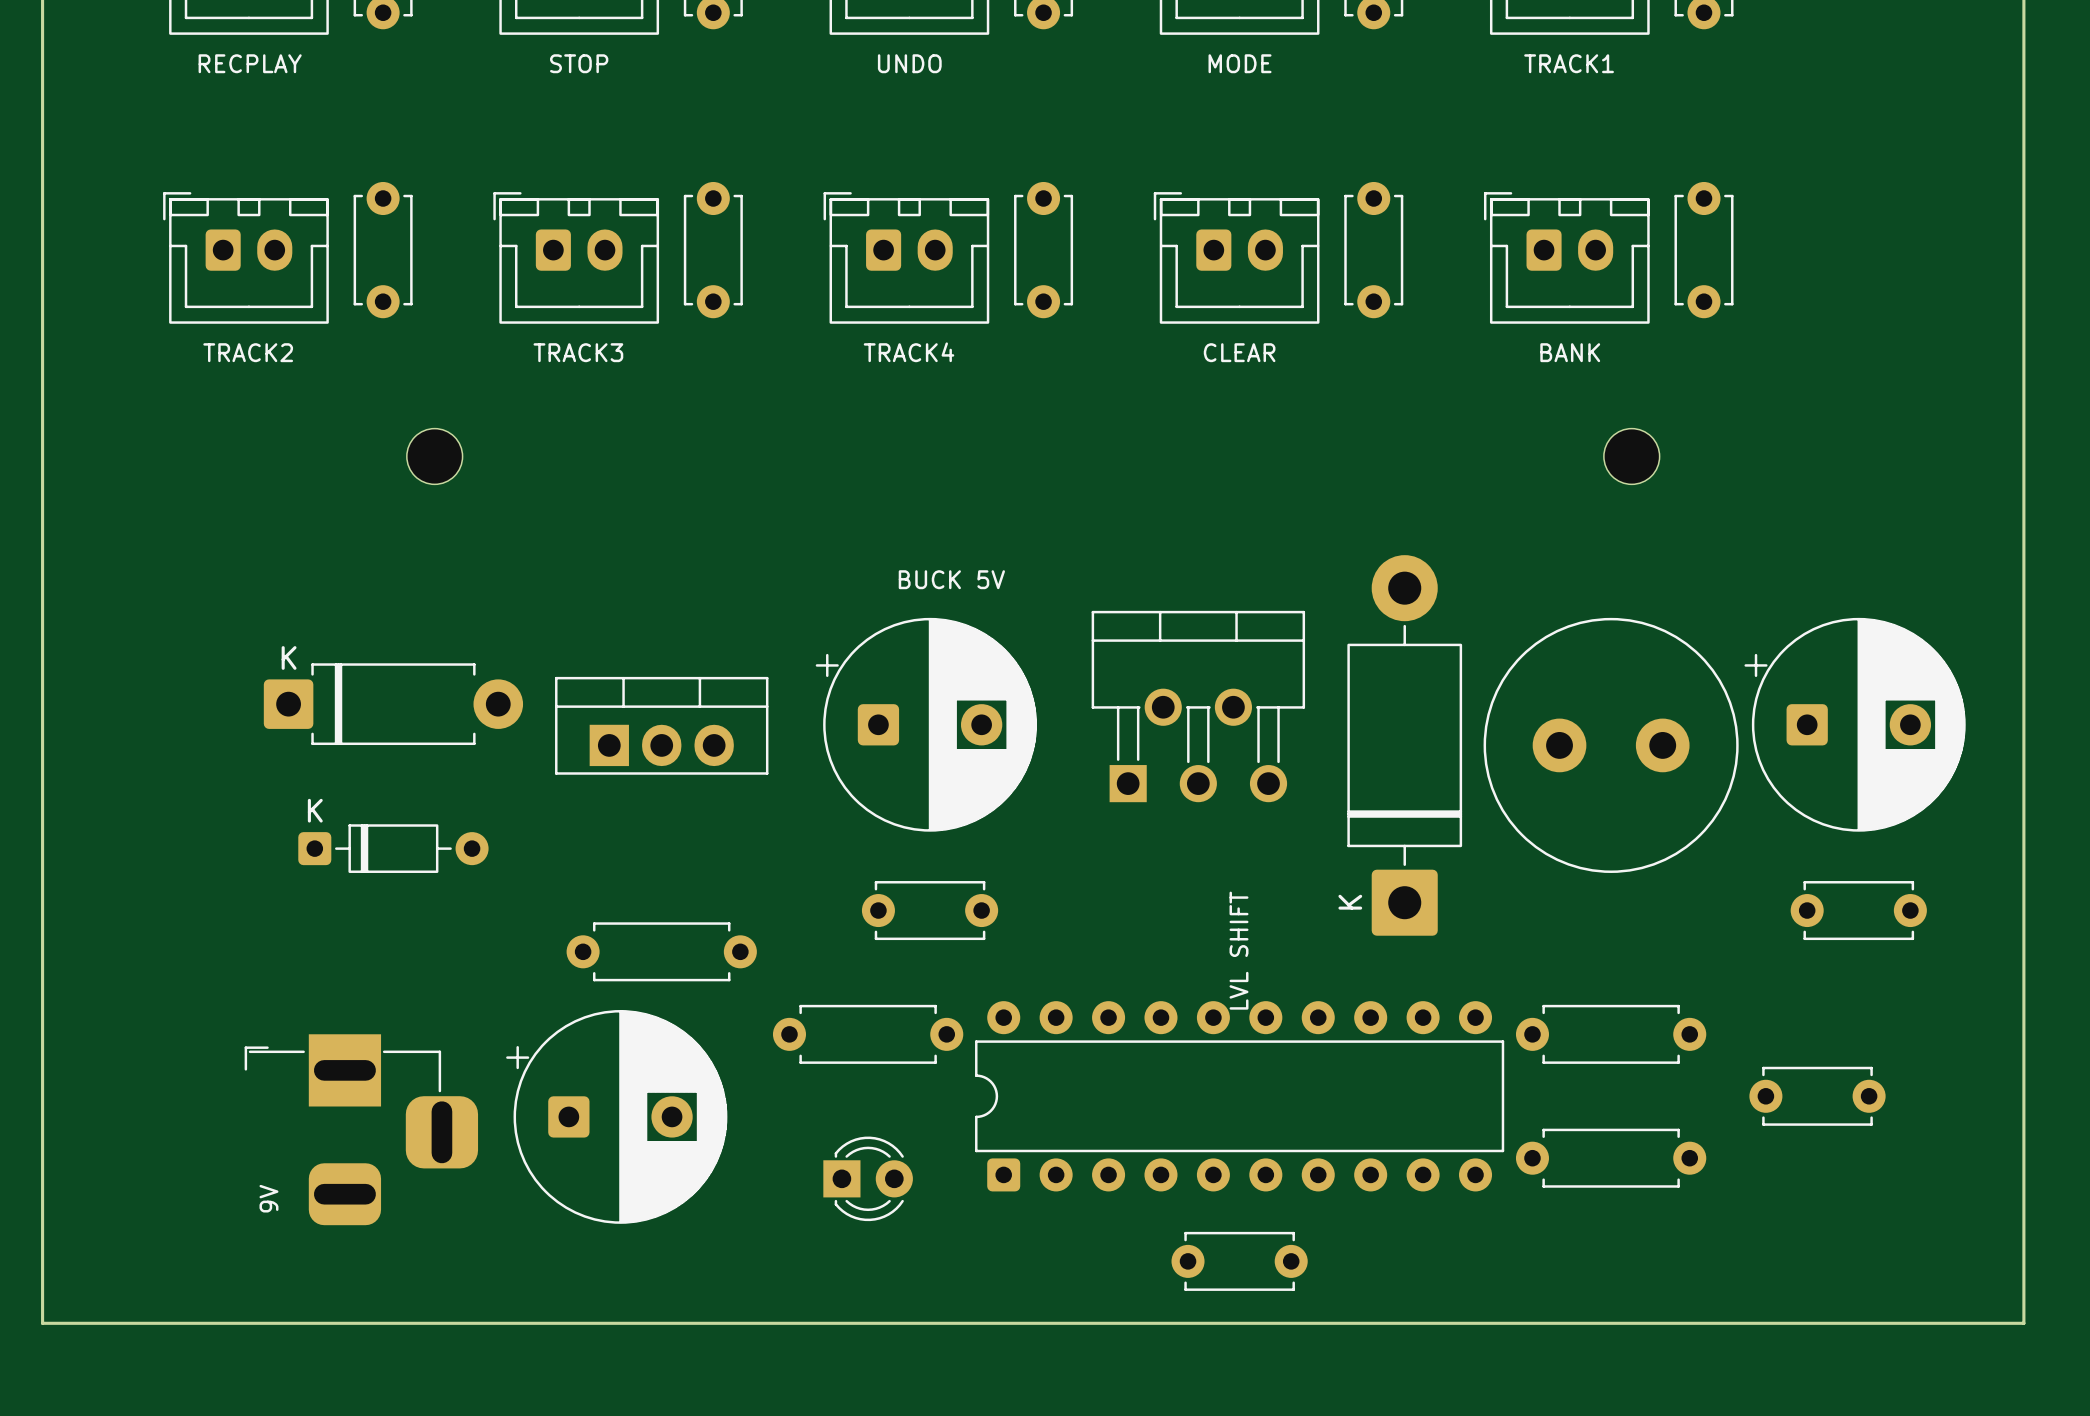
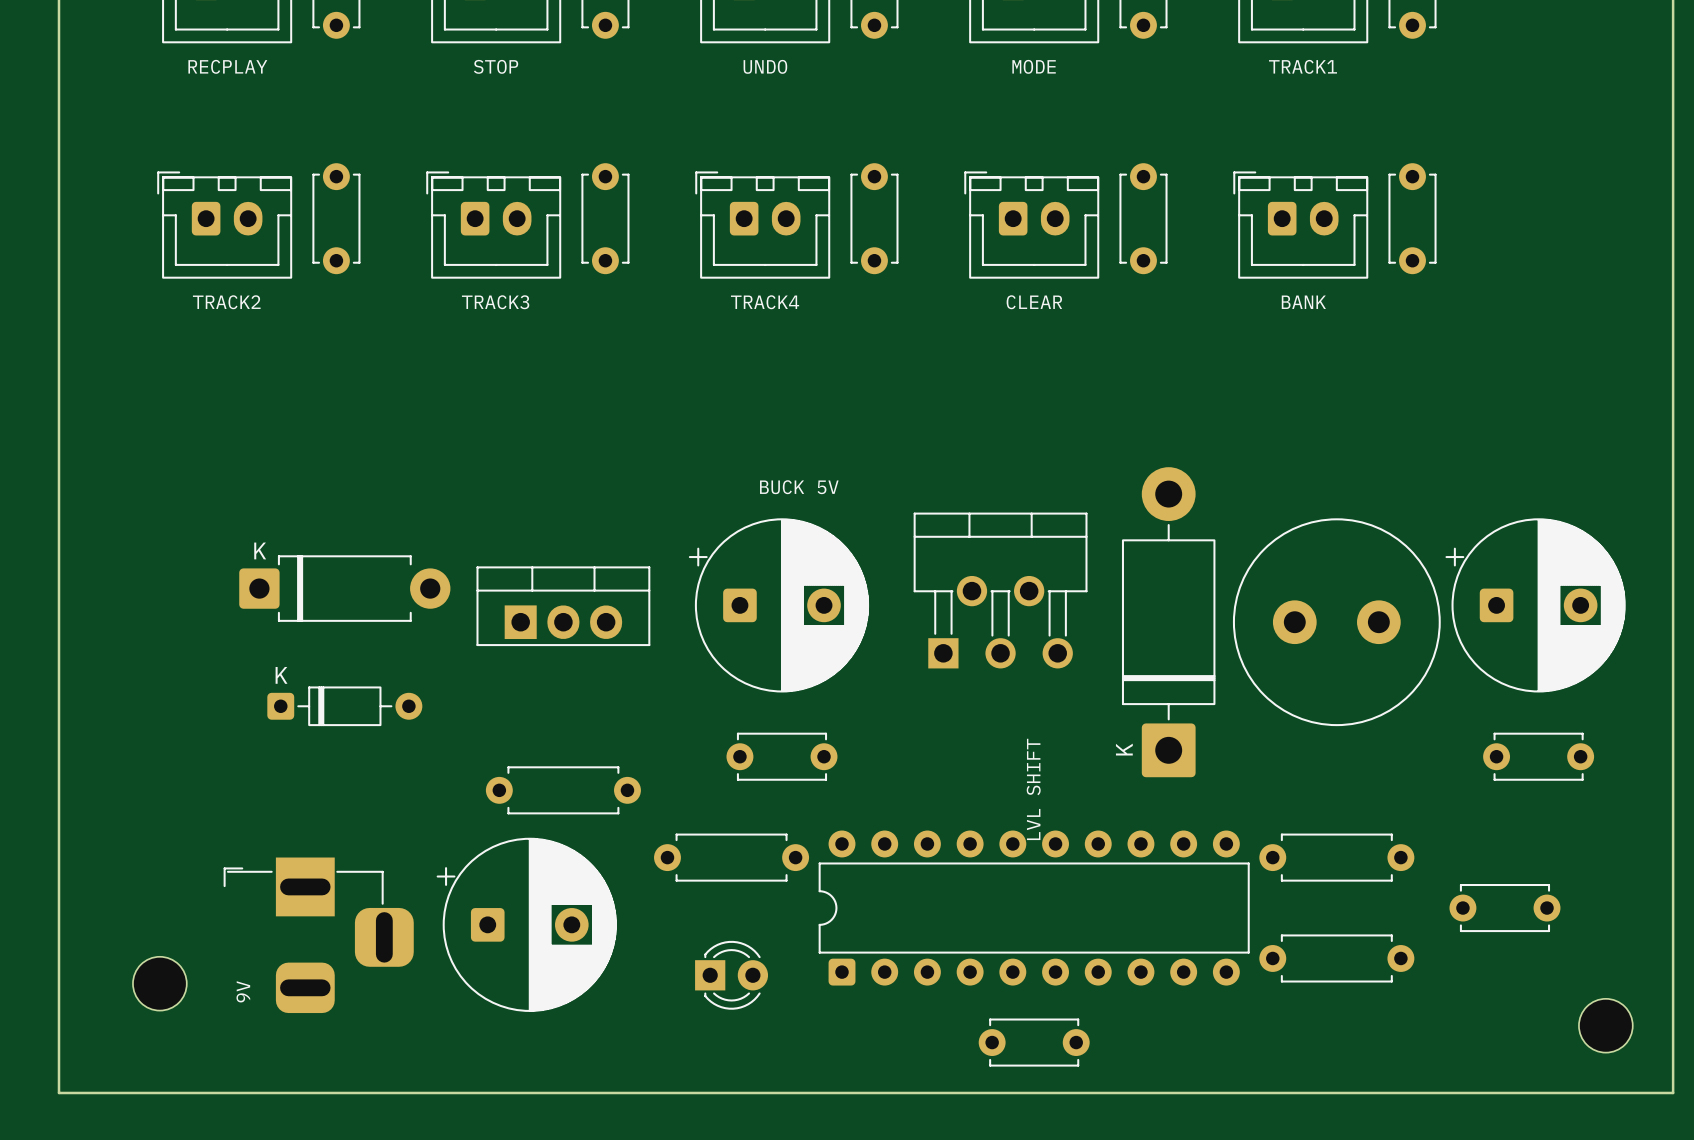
part: (434, 456) -> none
part: (1631, 456) -> none
part: none -> (159, 983)
part: none -> (1605, 1025)

